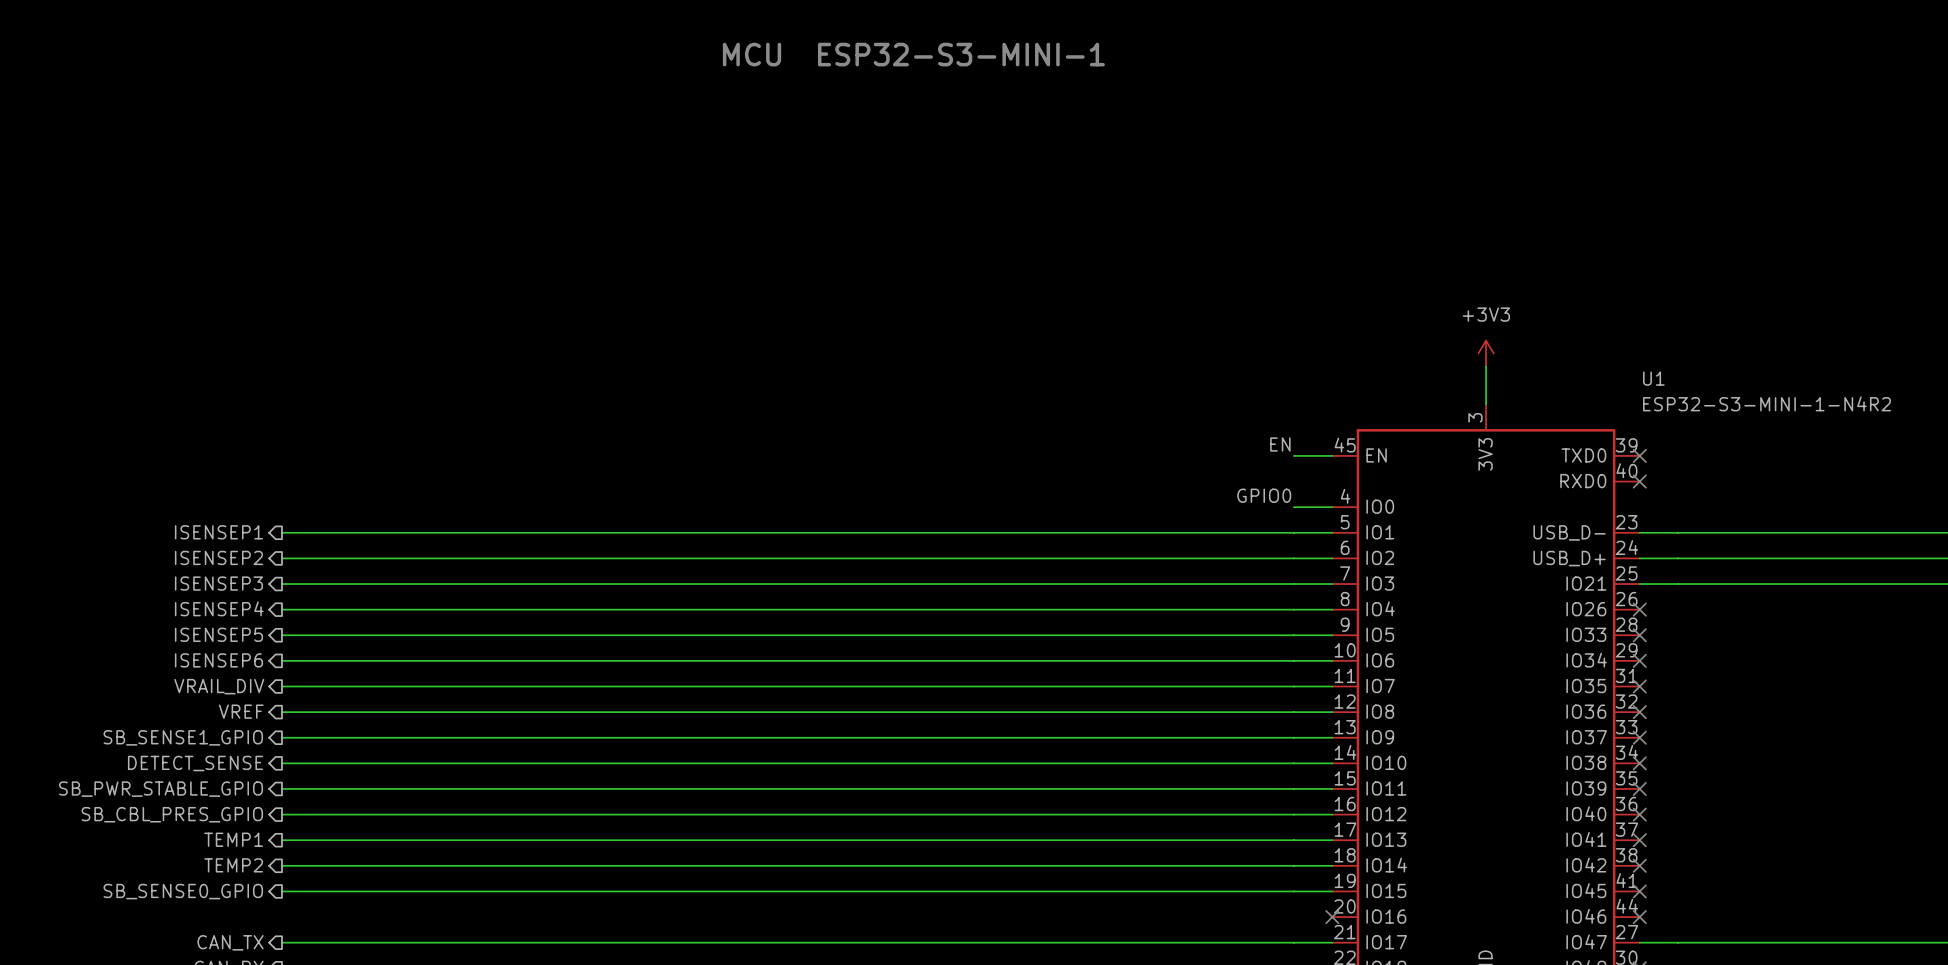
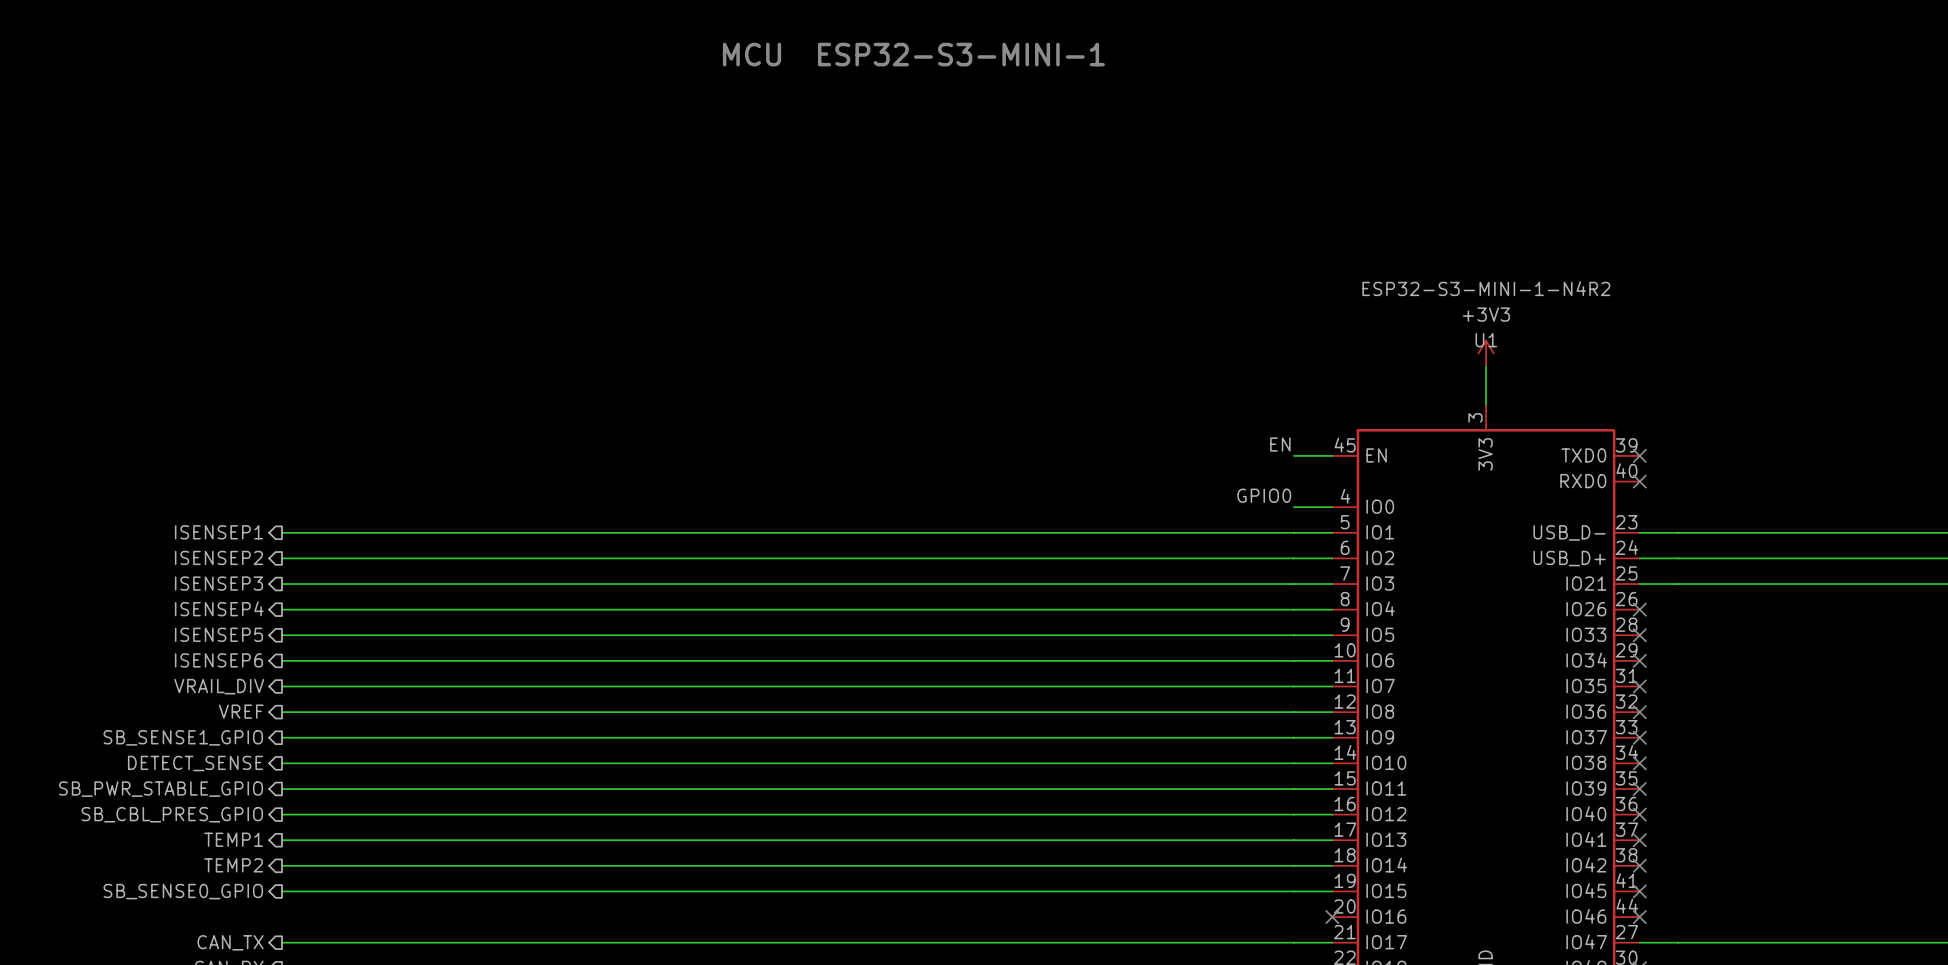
U1 name position: U1 (1653, 378) -> U1 (1486, 340)
U1 value position: ESP32-S3-MINI-1-N4R2 (1767, 403) -> ESP32-S3-MINI-1-N4R2 (1486, 288)

